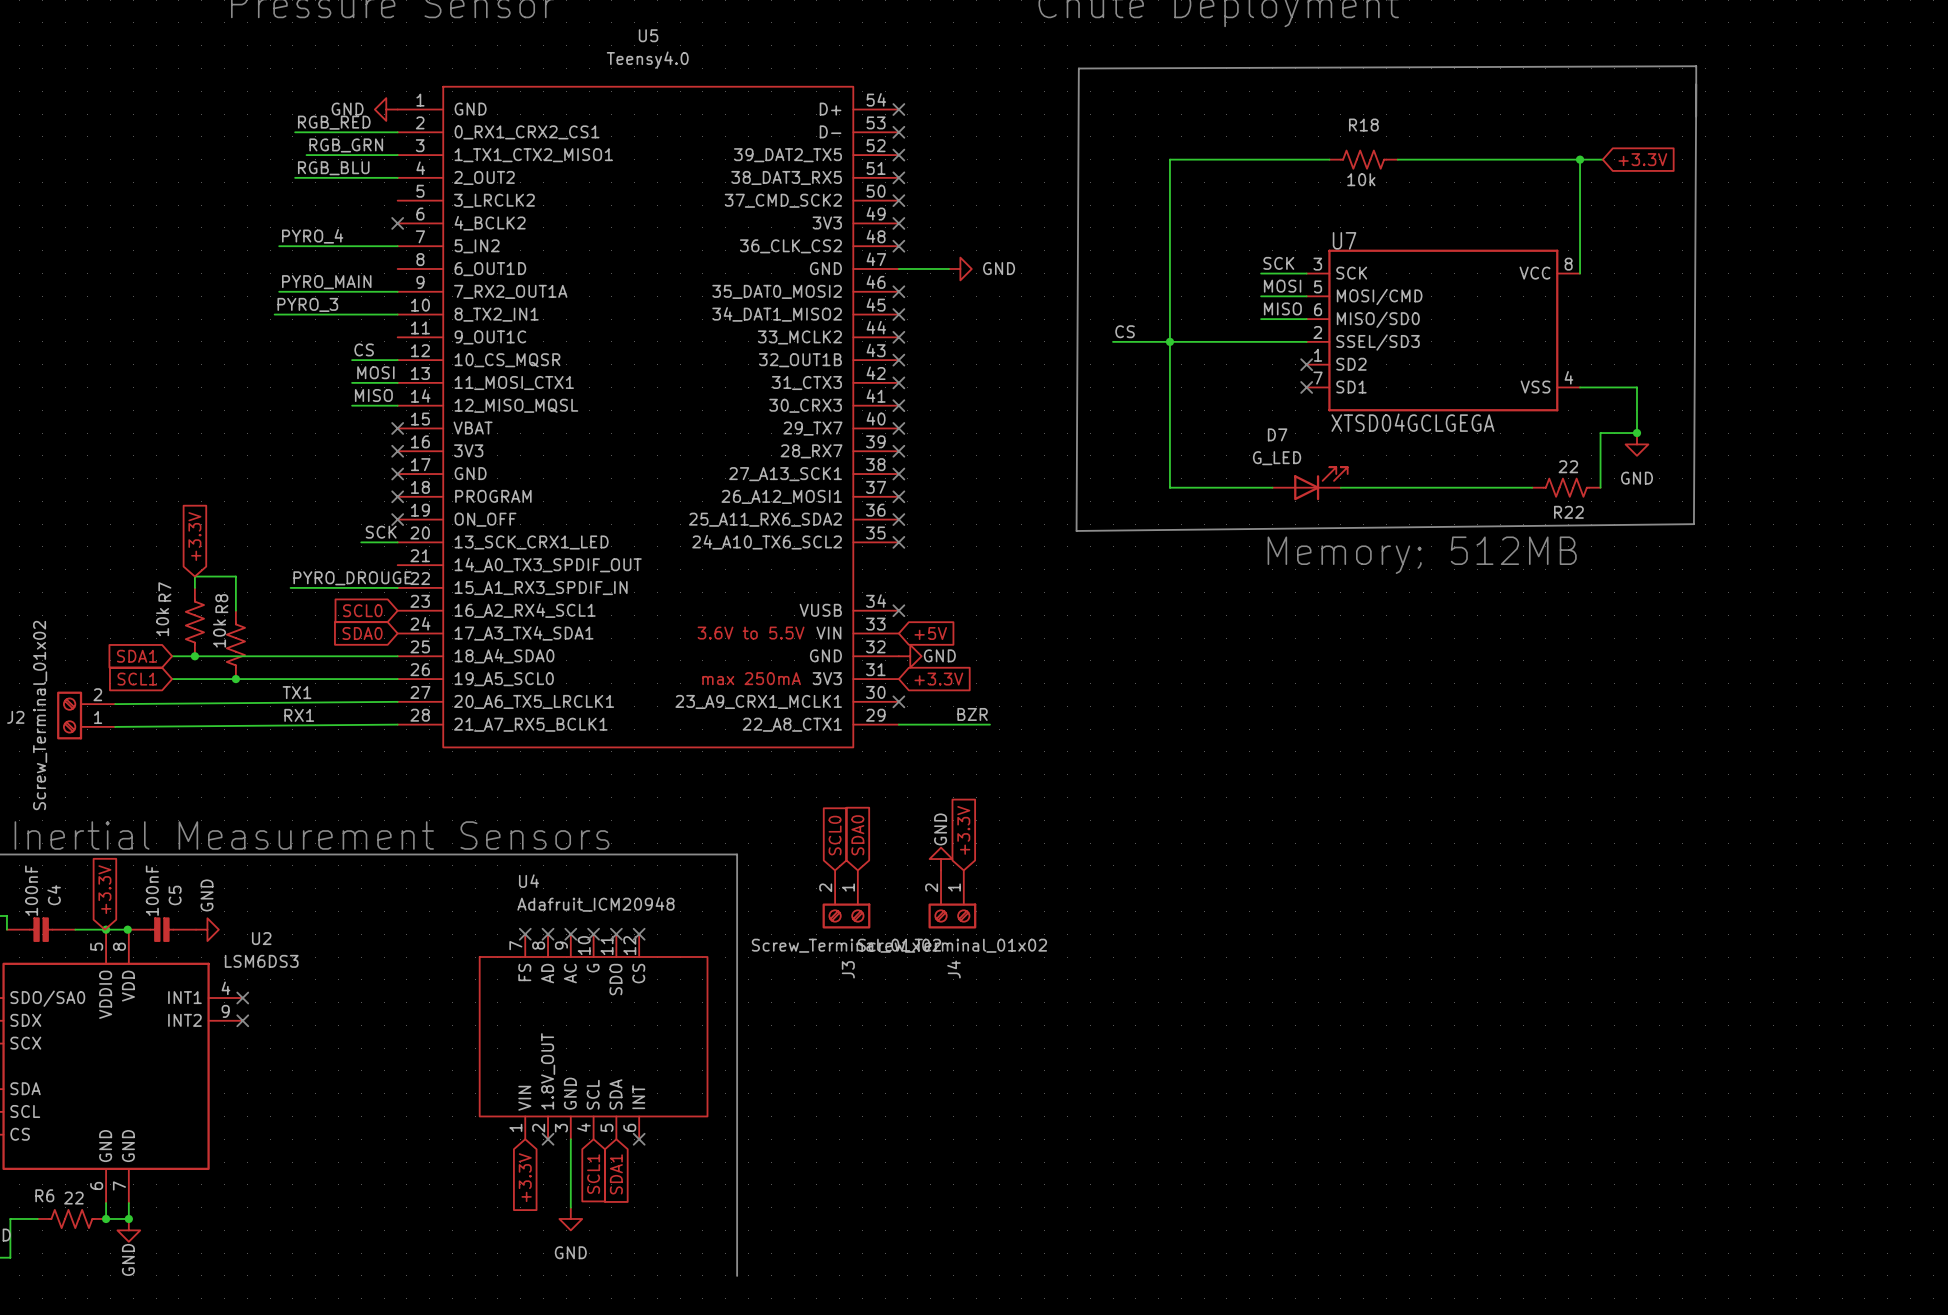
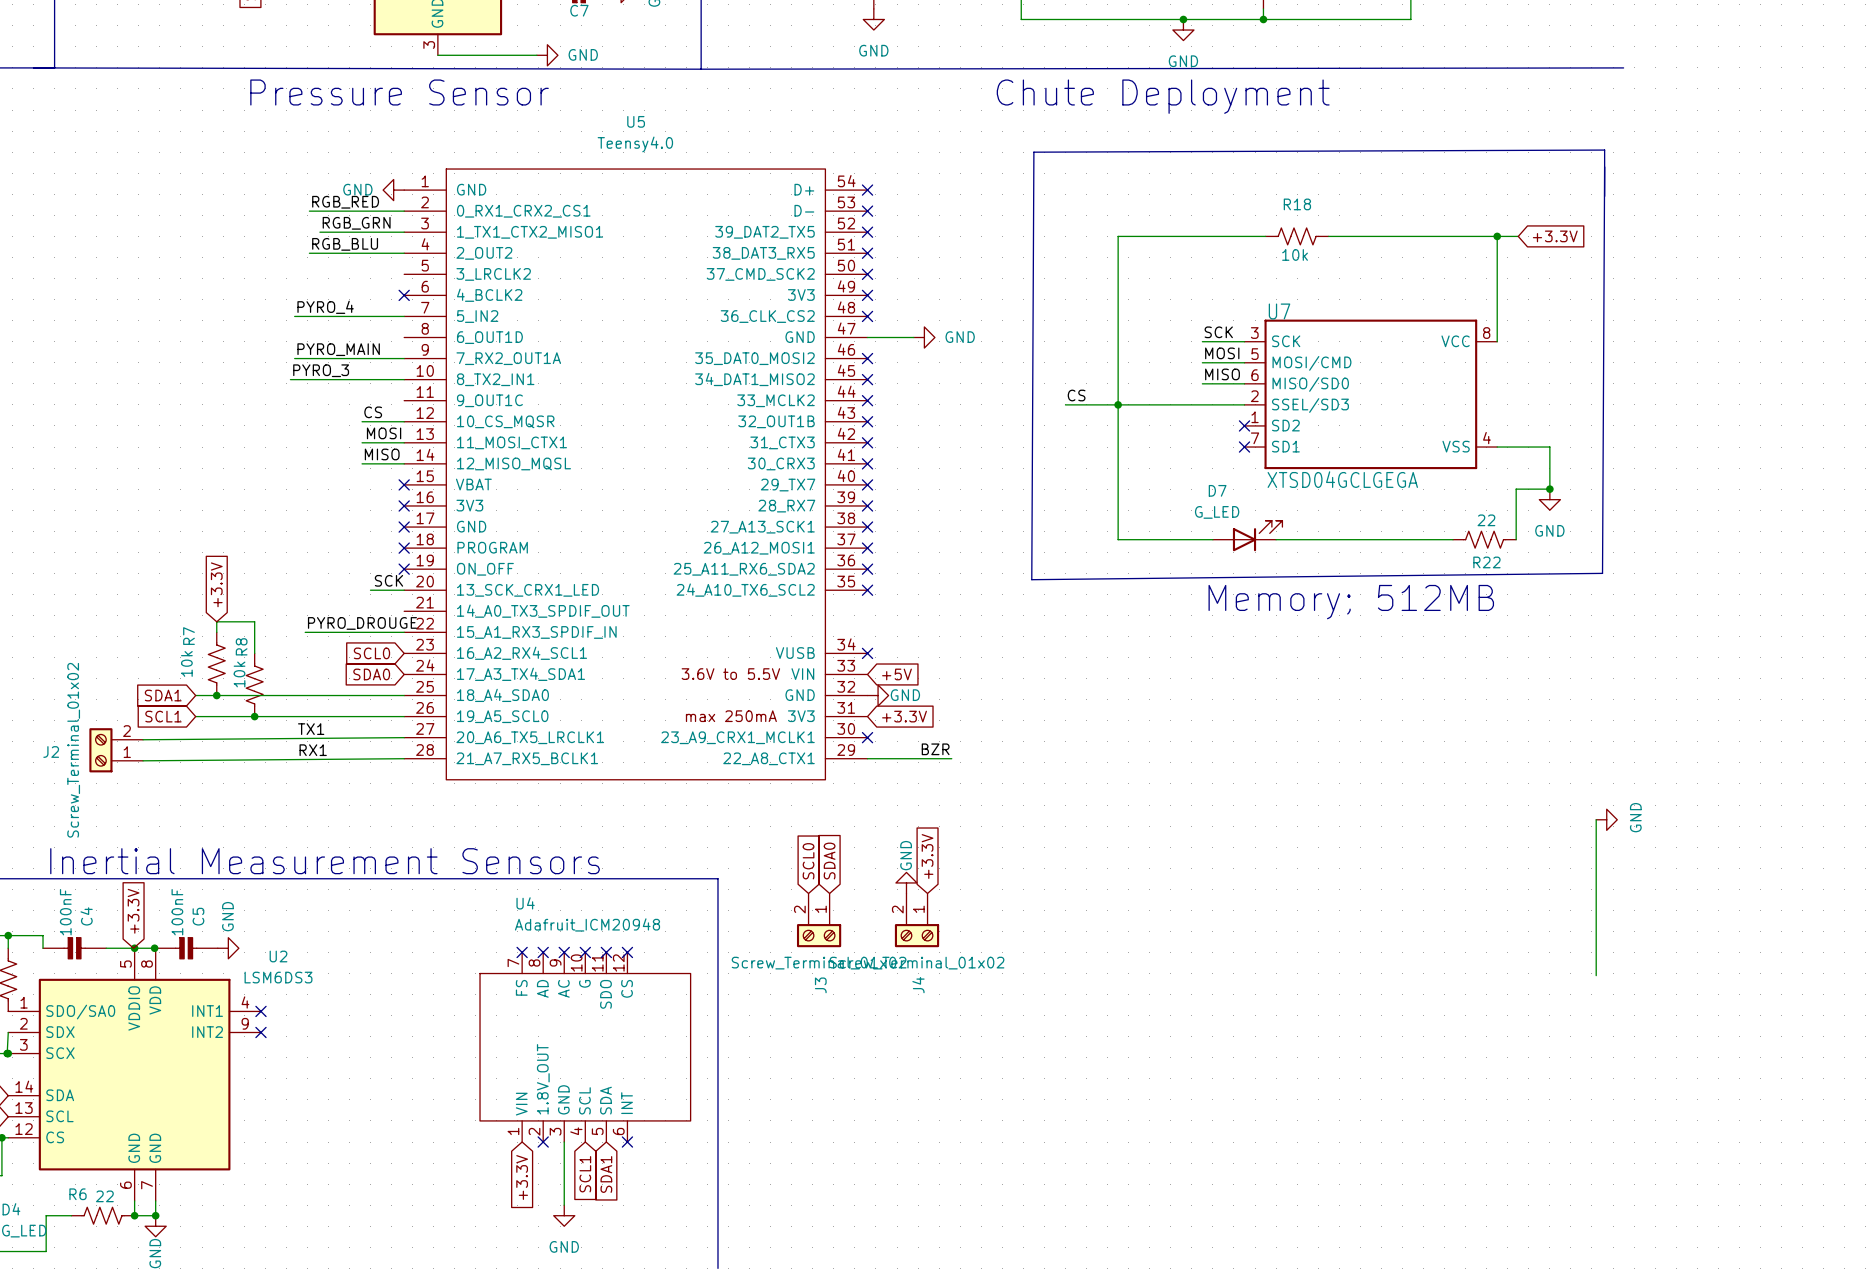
wire: none -> (1596, 819) (1596, 975)
power symbol: none -> GND (1606, 819)

